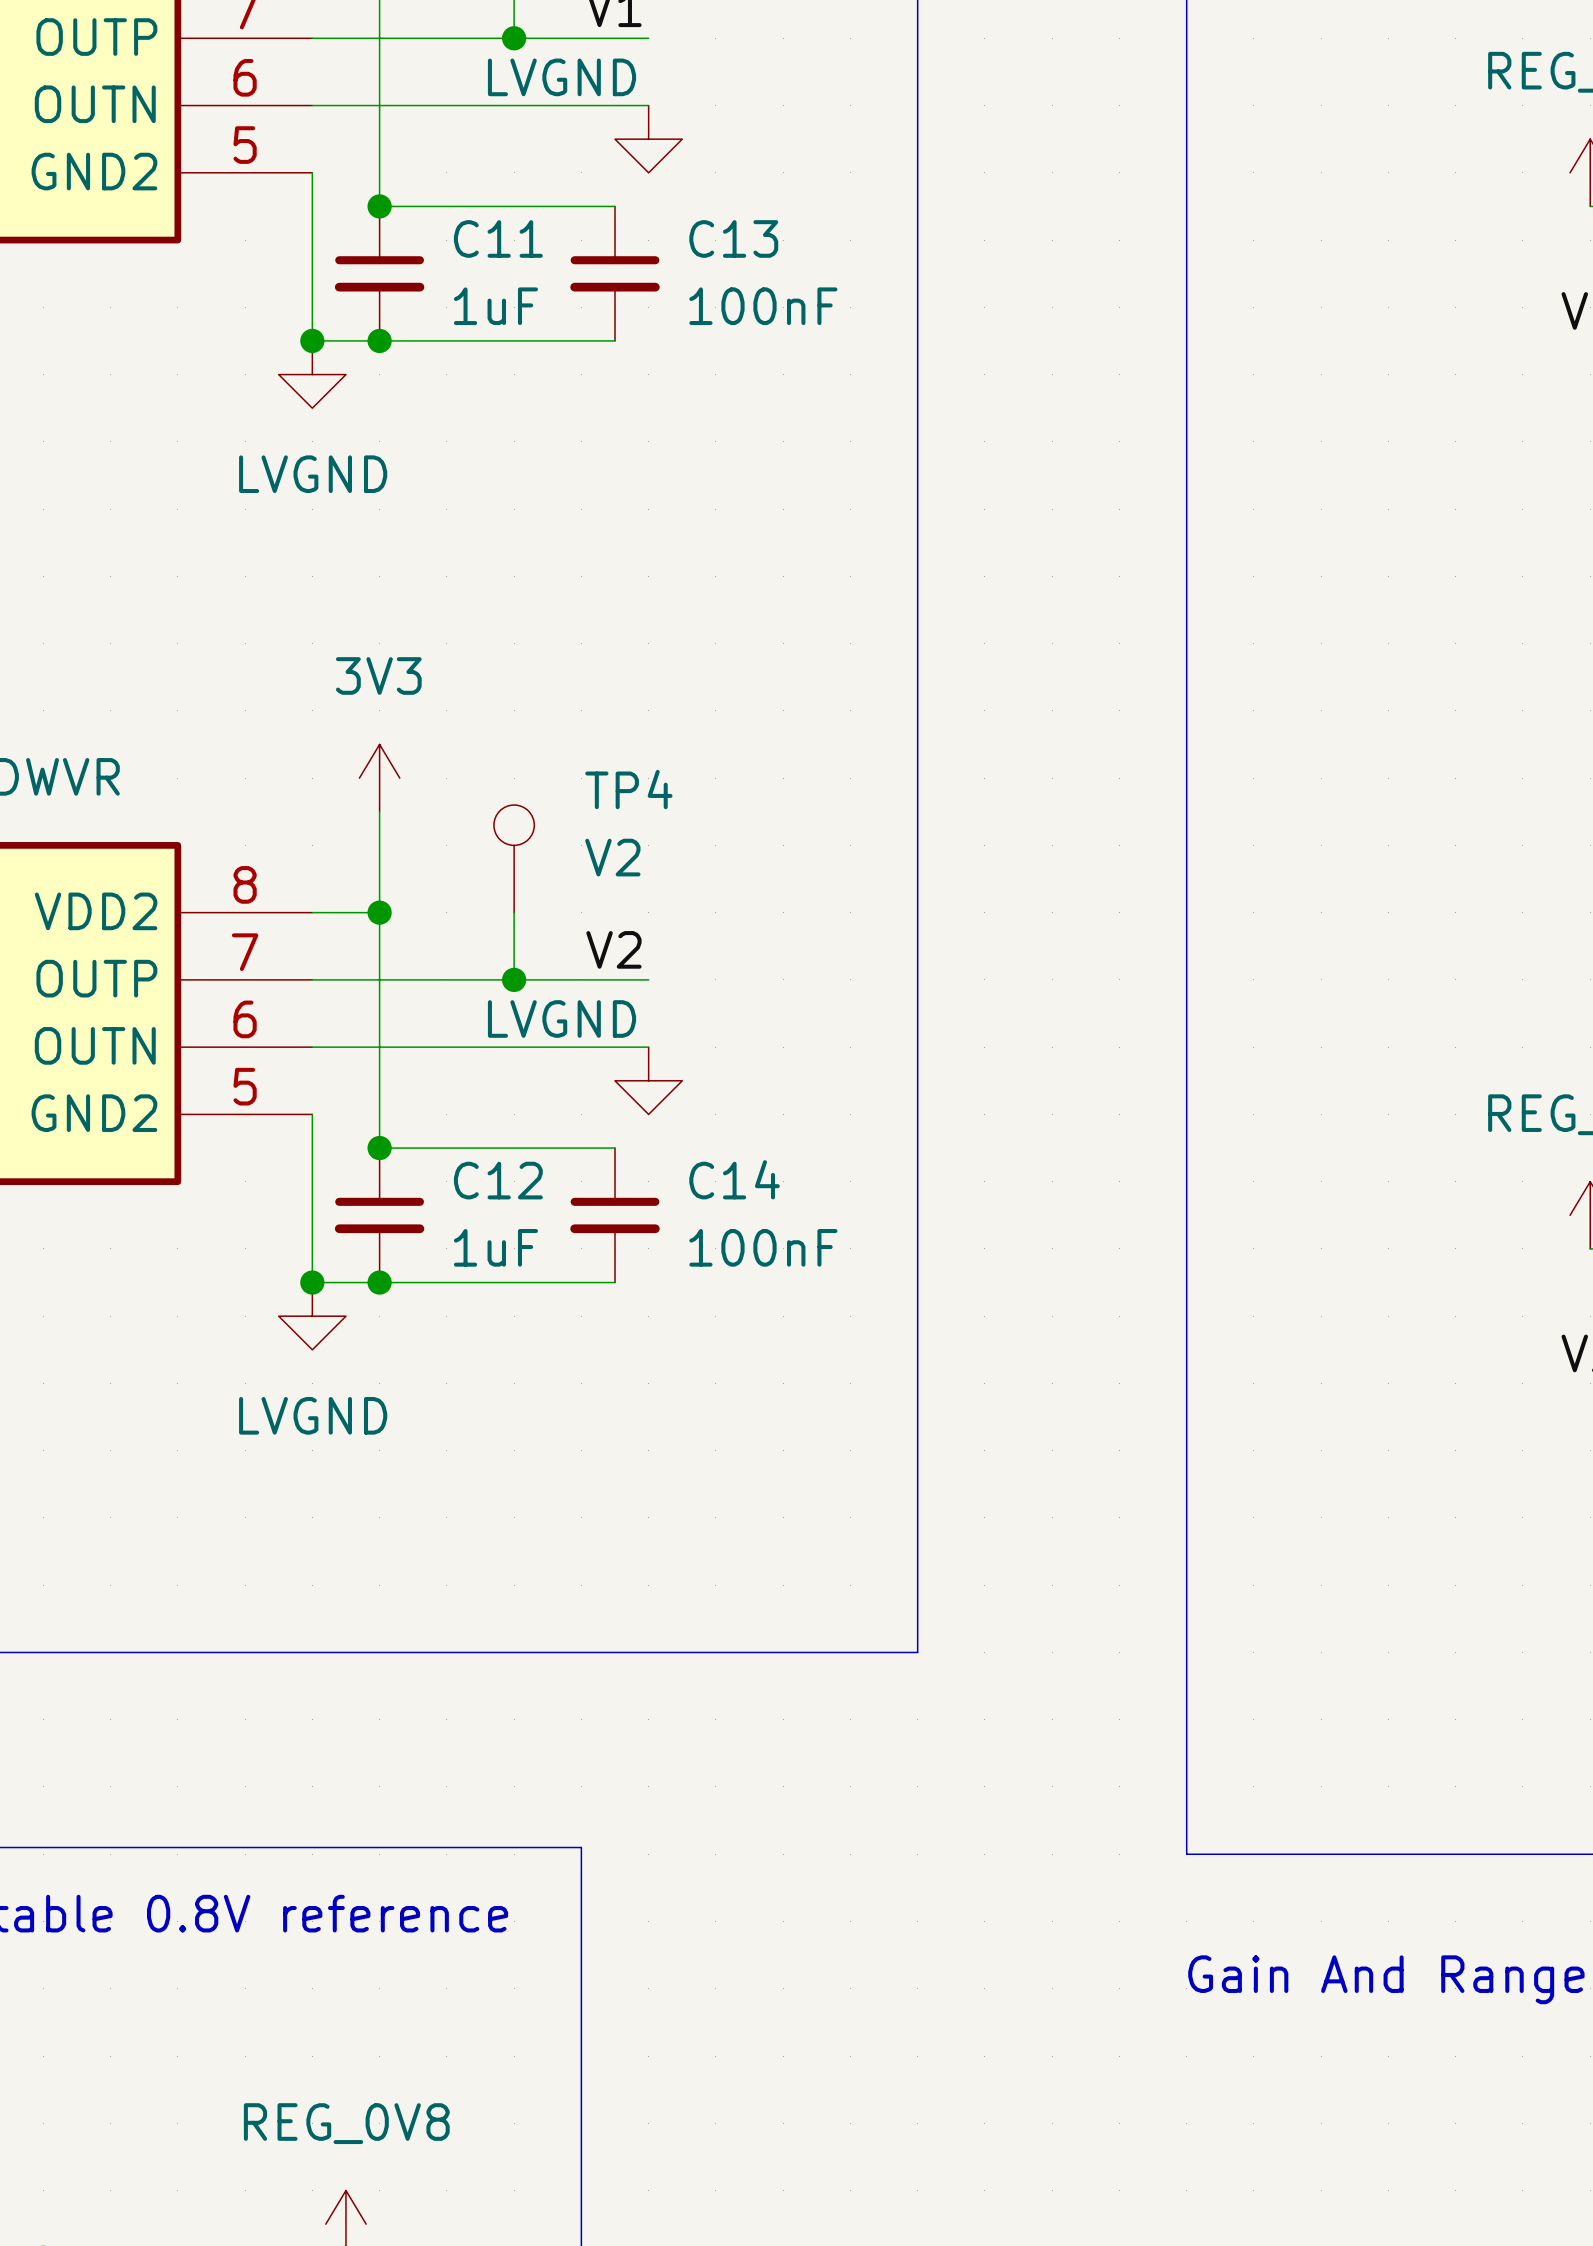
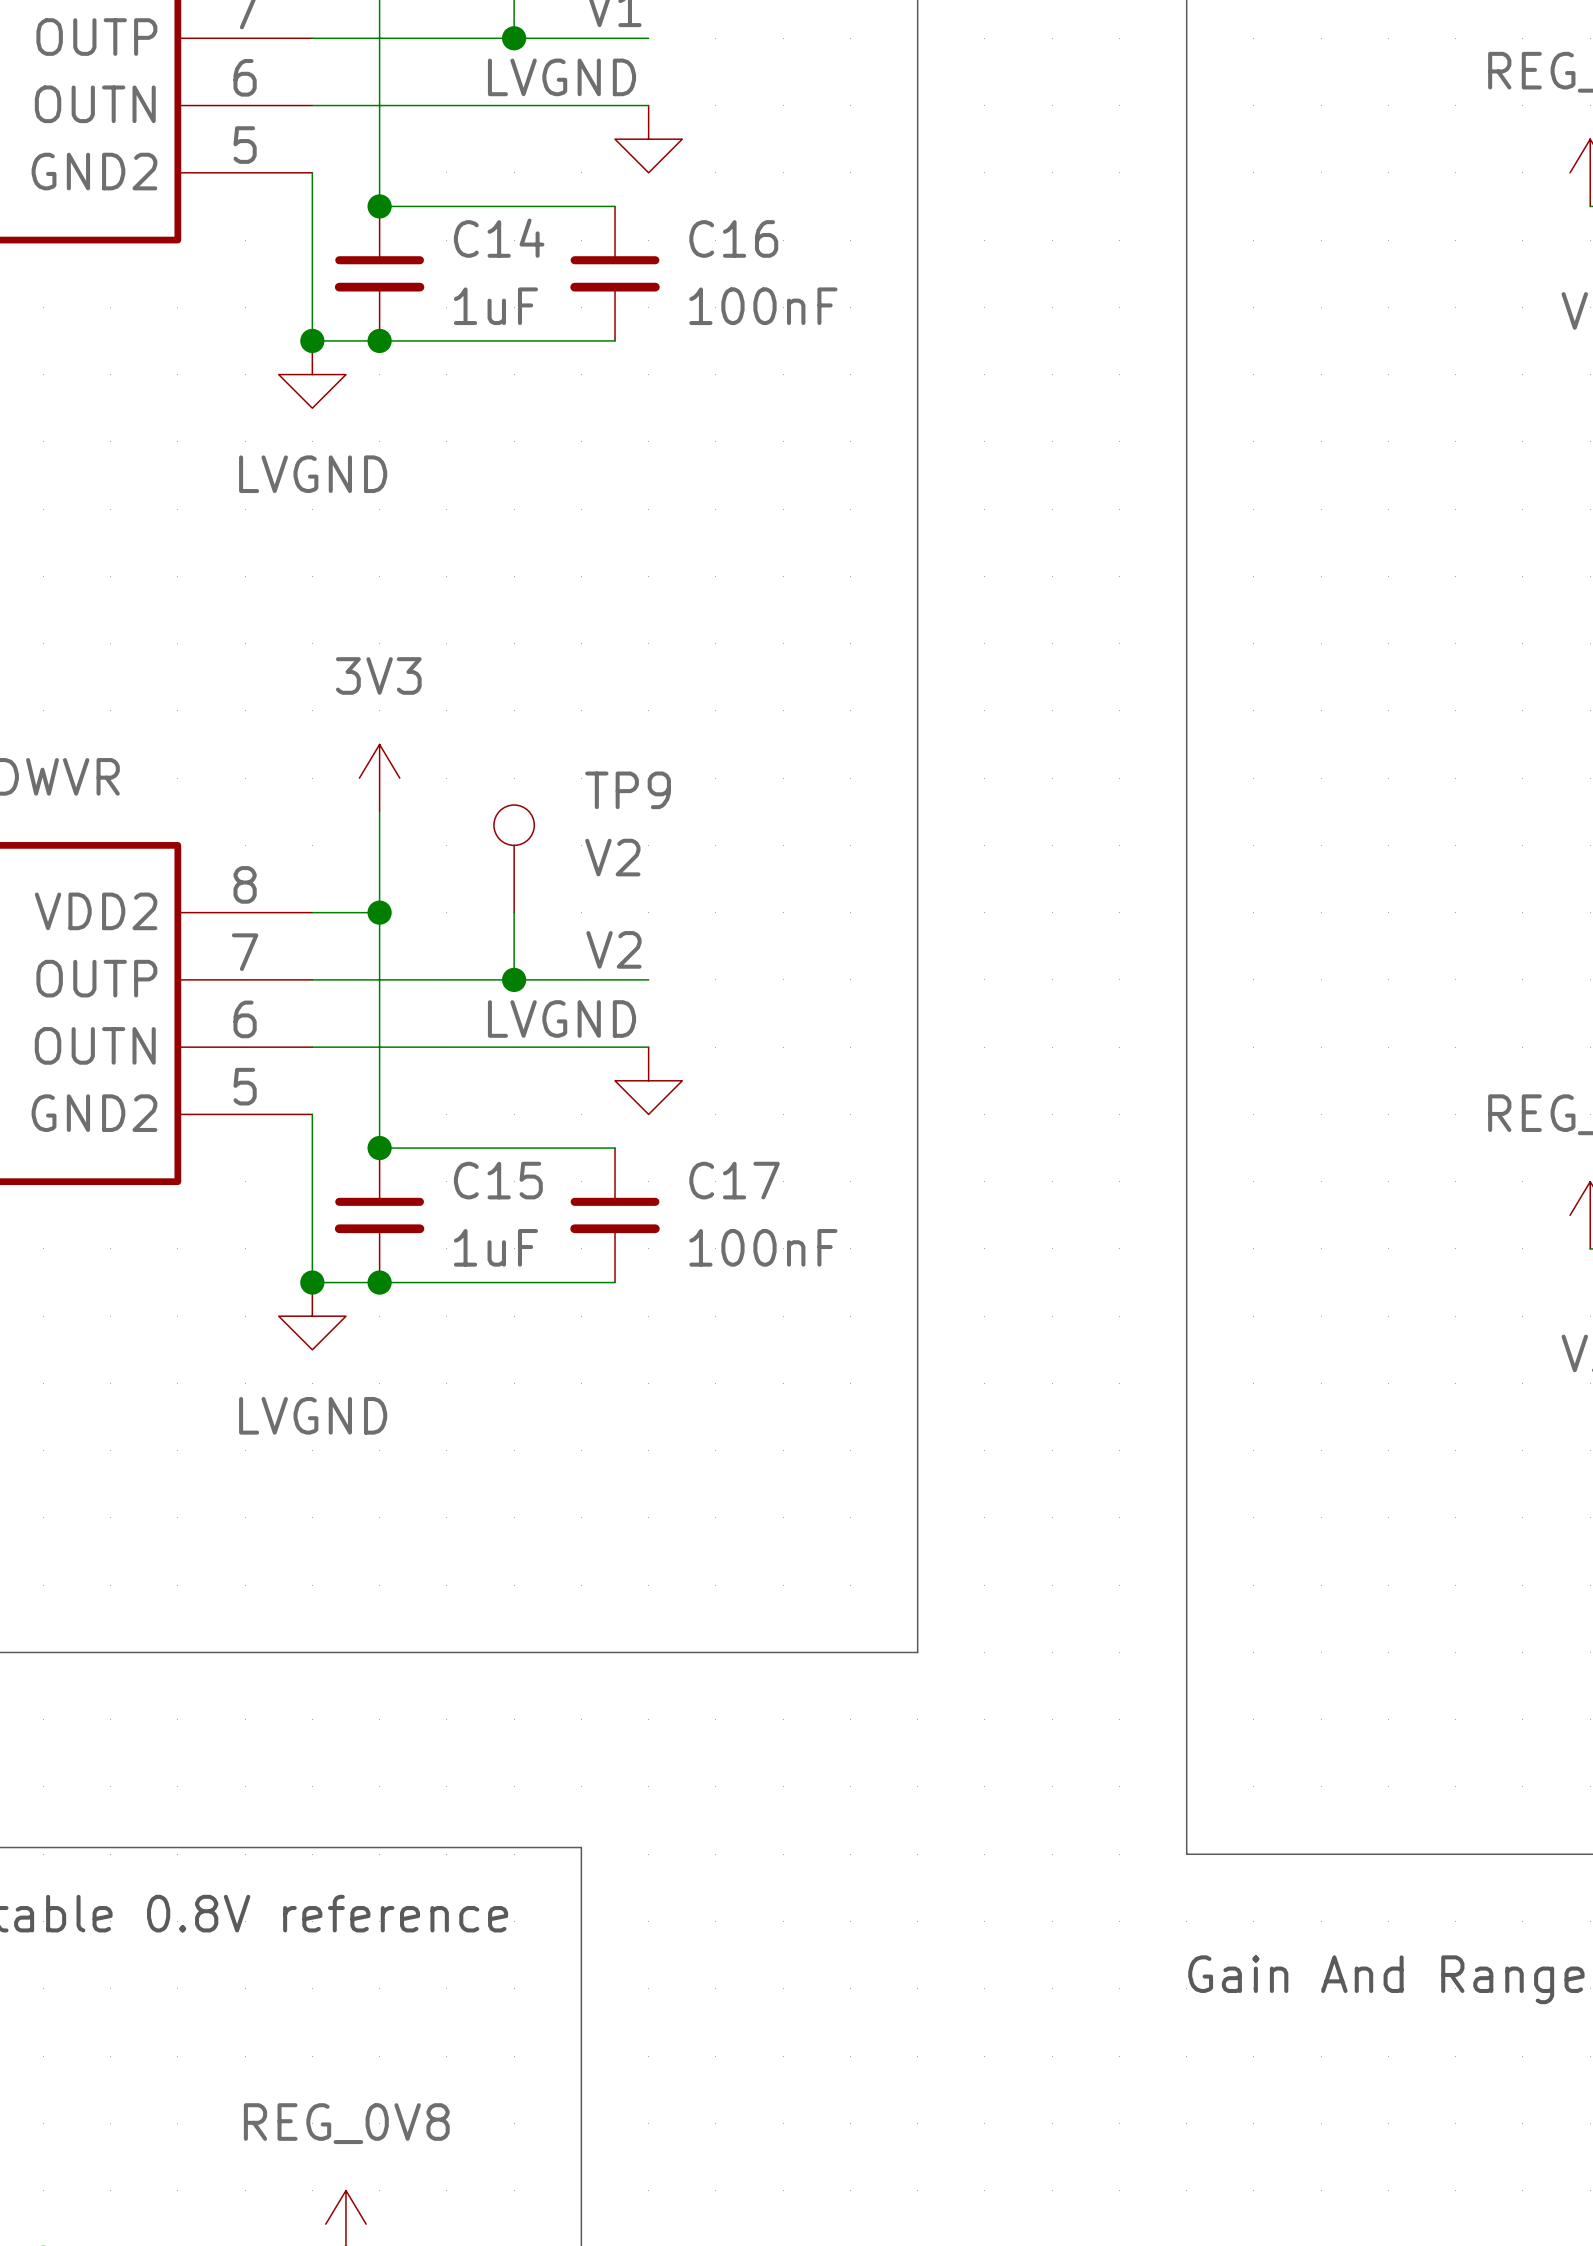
C11 name: C11 (498, 238) -> C14 (499, 238)
C13 name: C13 (733, 238) -> C16 (733, 238)
TP4 name: TP4 (628, 789) -> TP9 (628, 790)
C14 name: C14 (734, 1179) -> C17 (734, 1180)
C12 name: C12 (498, 1180) -> C15 (498, 1180)

